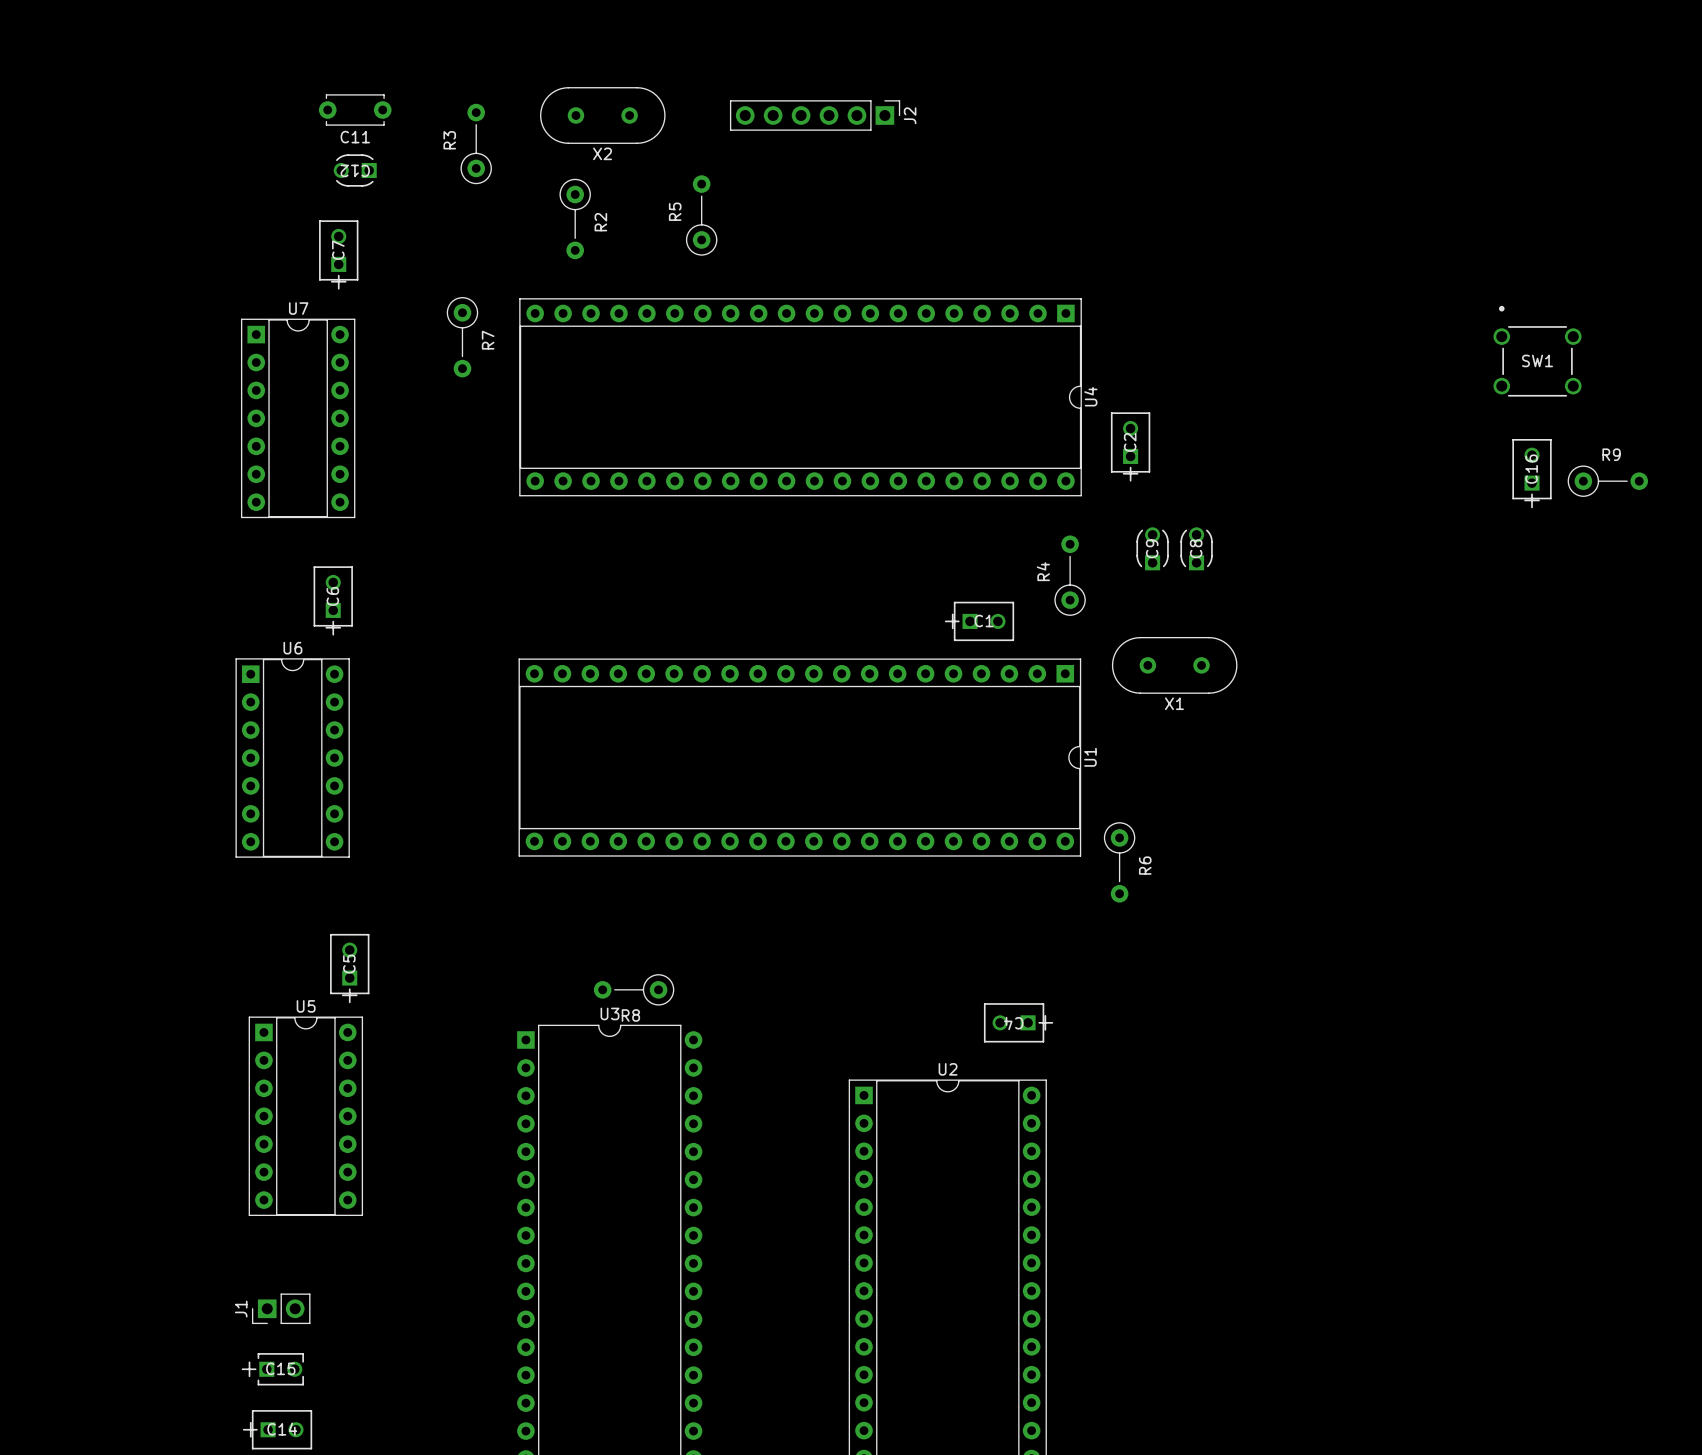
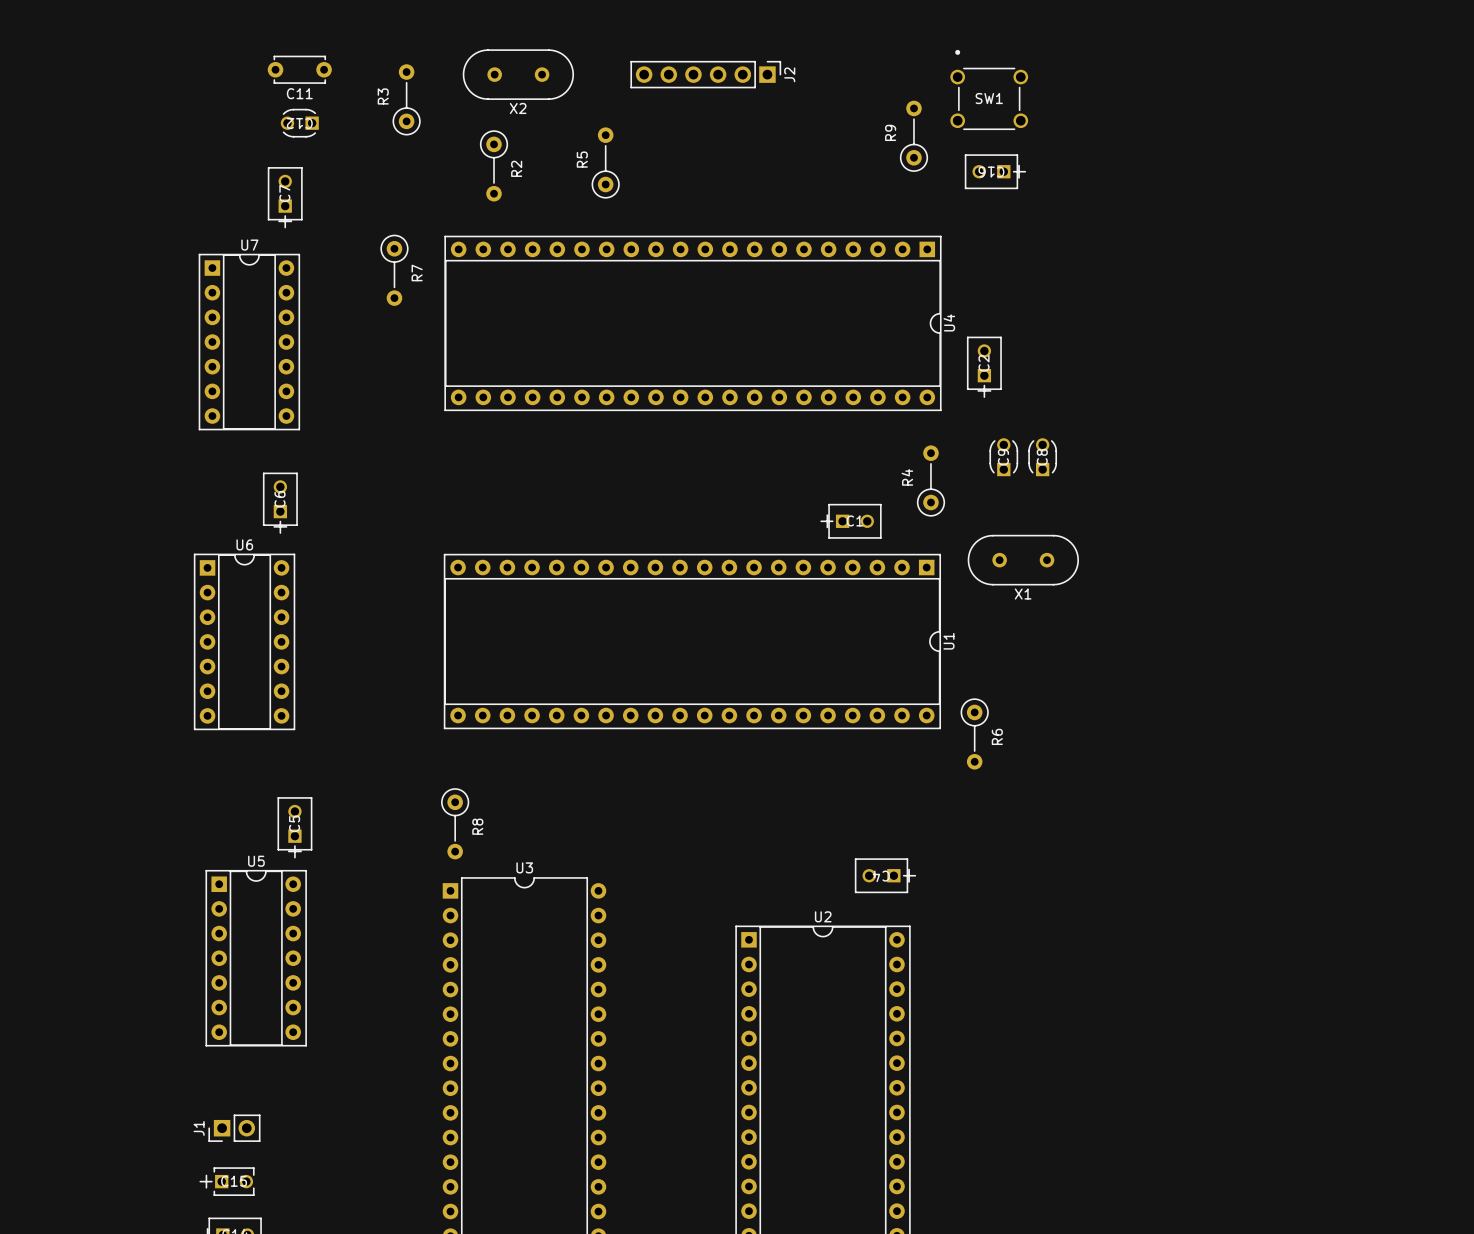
SW1 position: (1537, 351) -> (989, 89)
C16 rotation: 0° (1532, 473) -> 90° counterclockwise (995, 171)
C16 position: (1532, 473) -> (995, 171)
R9 rotation: 0° (1607, 481) -> 90° counterclockwise (913, 136)
R9 position: (1607, 481) -> (913, 136)
R8 rotation: 0° (634, 989) -> 90° counterclockwise (455, 823)
R8 position: (634, 989) -> (455, 823)

